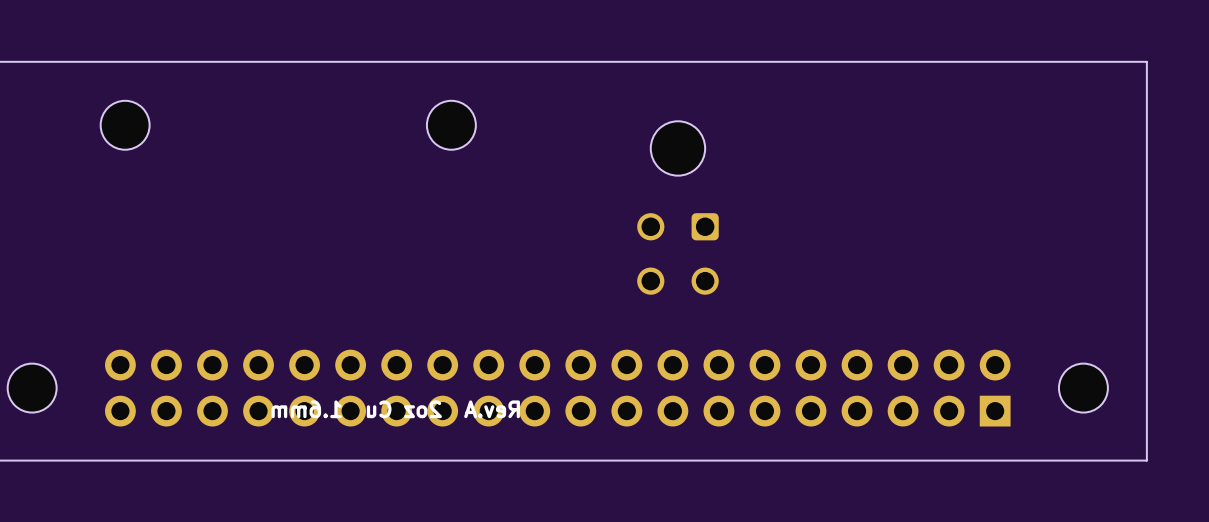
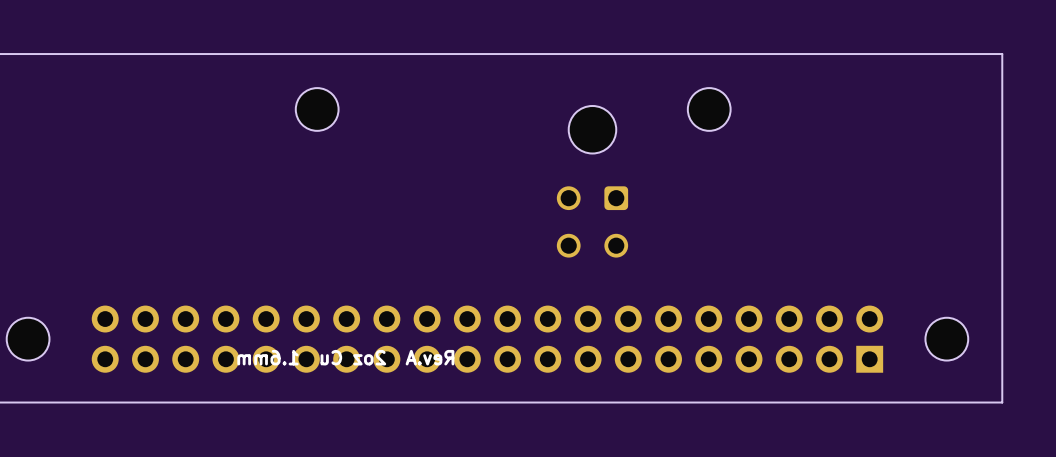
part: (125, 125) -> none
part position: (451, 125) -> (317, 109)
part: none -> (709, 109)

